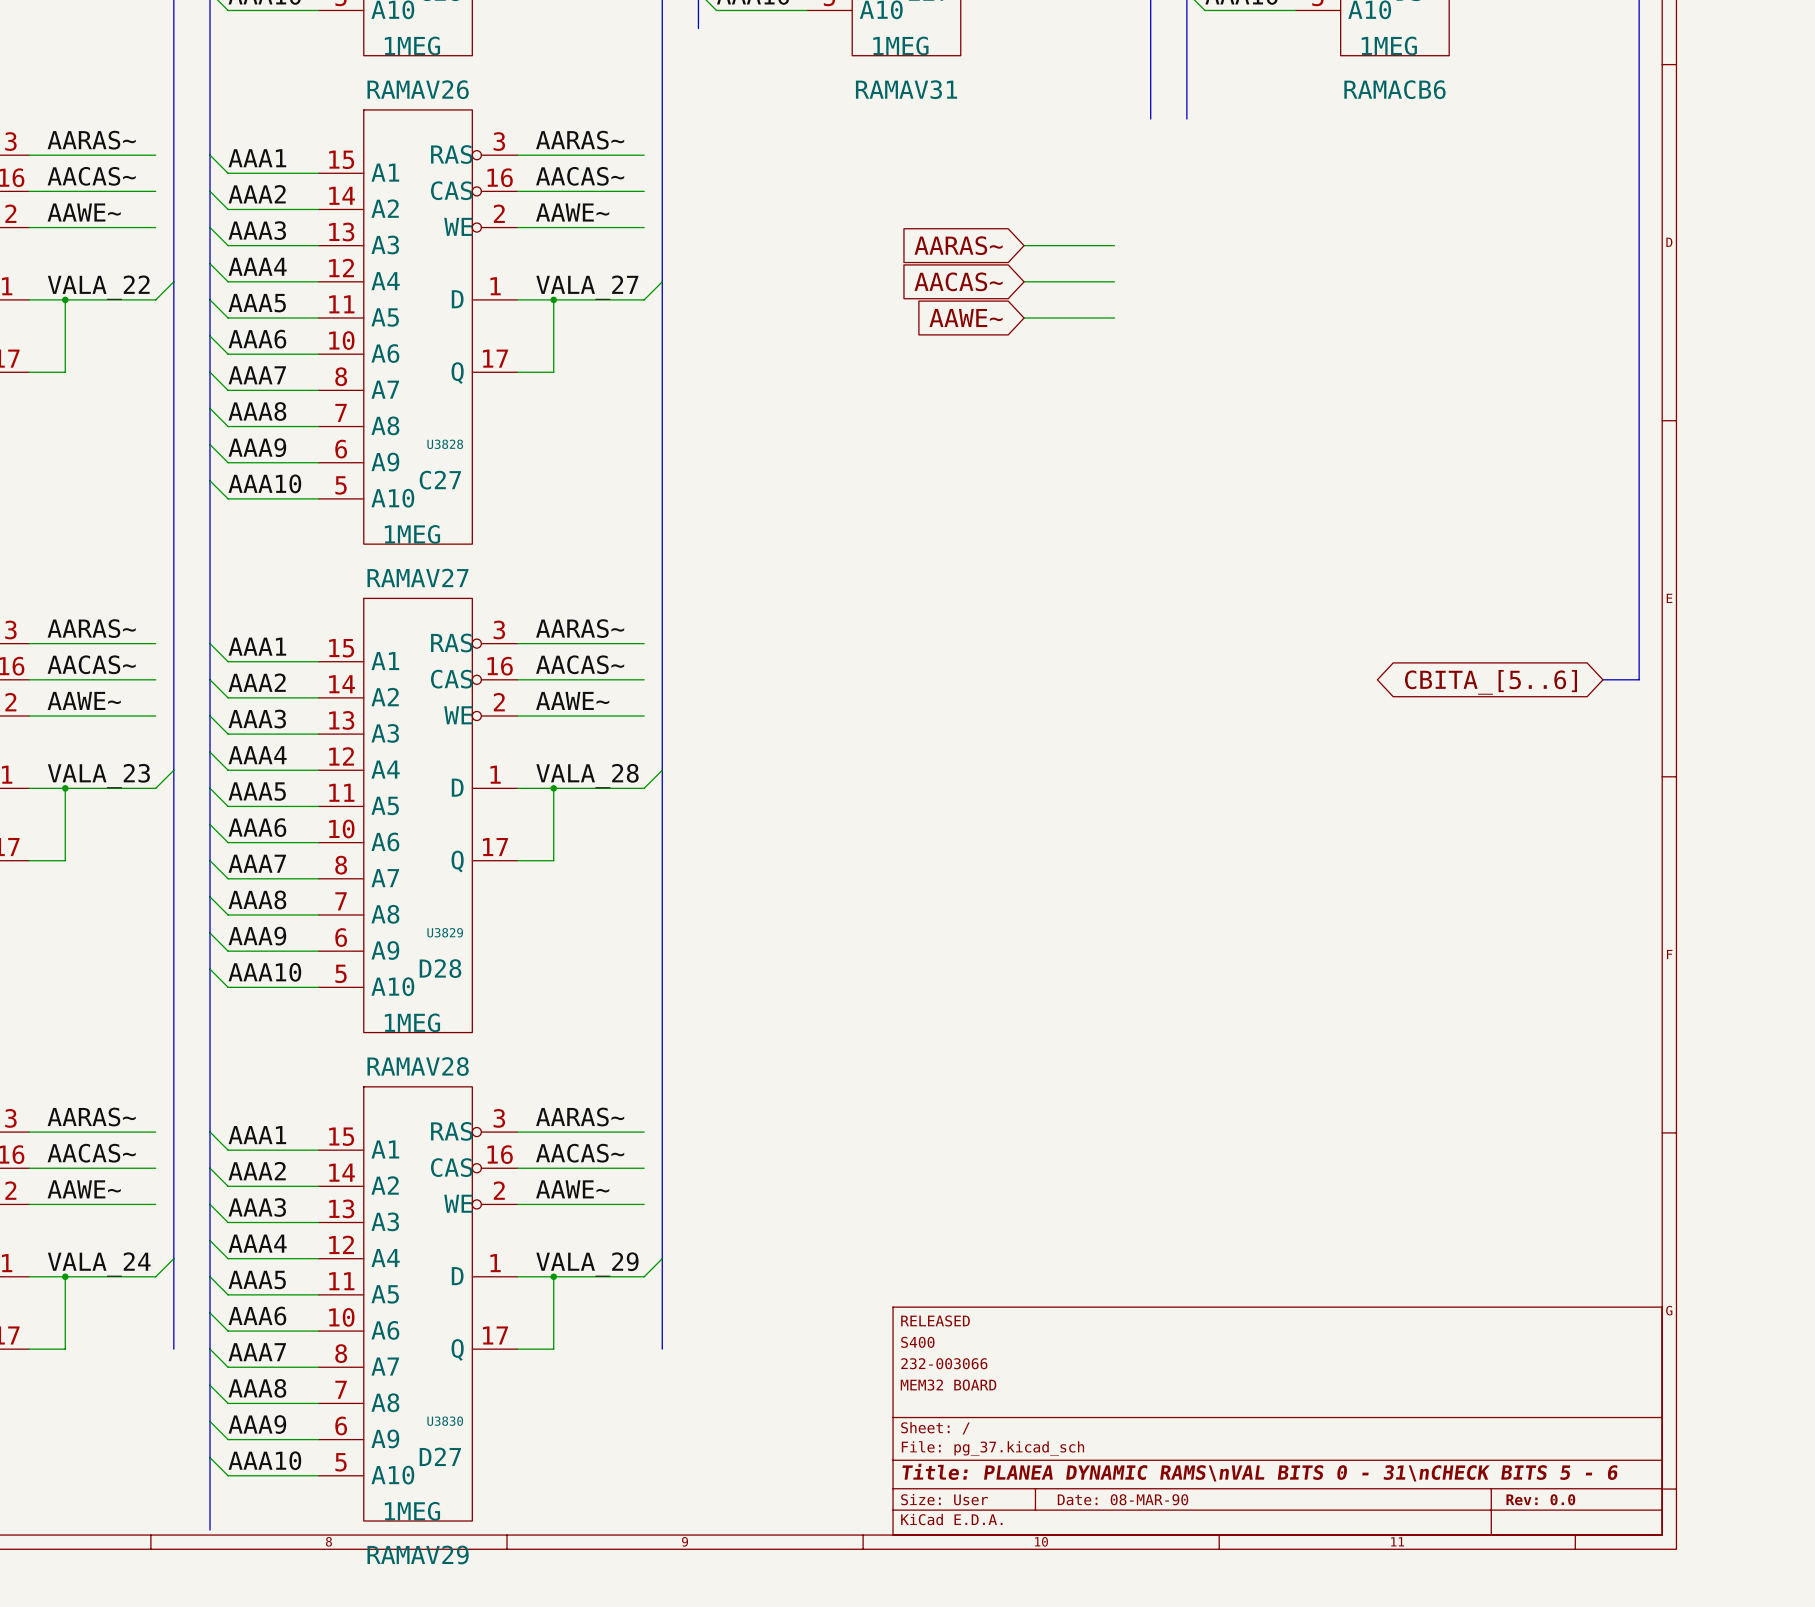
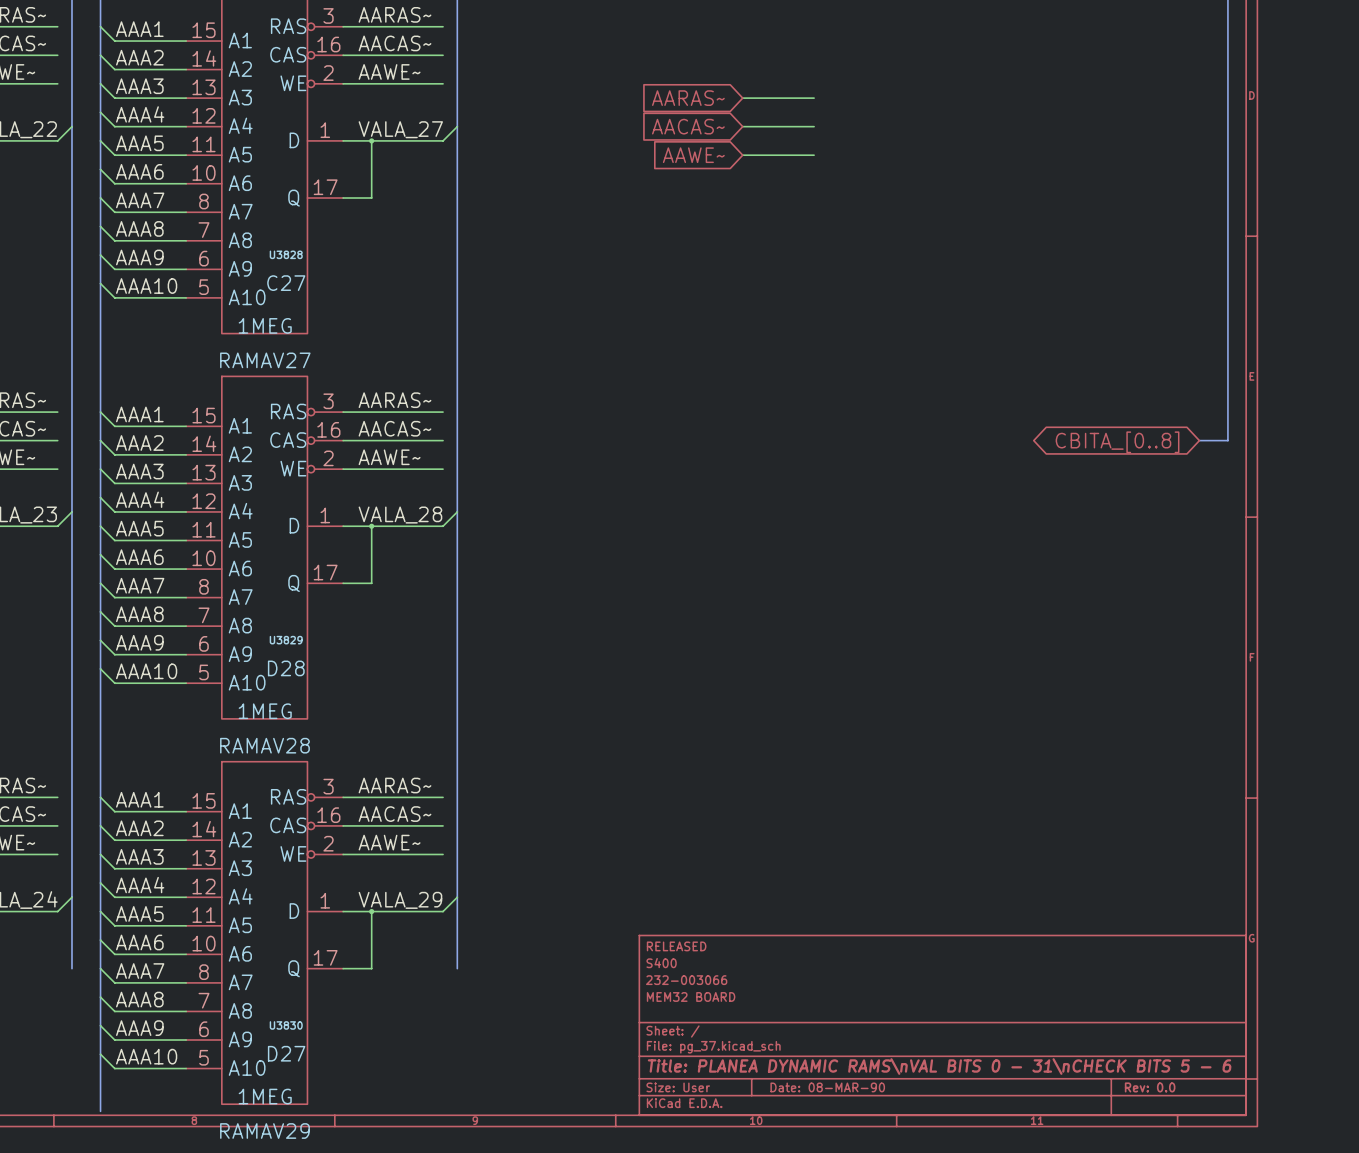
global label: CBITA_[5..6] (1491, 682) -> CBITA_[0..8] (1117, 442)

